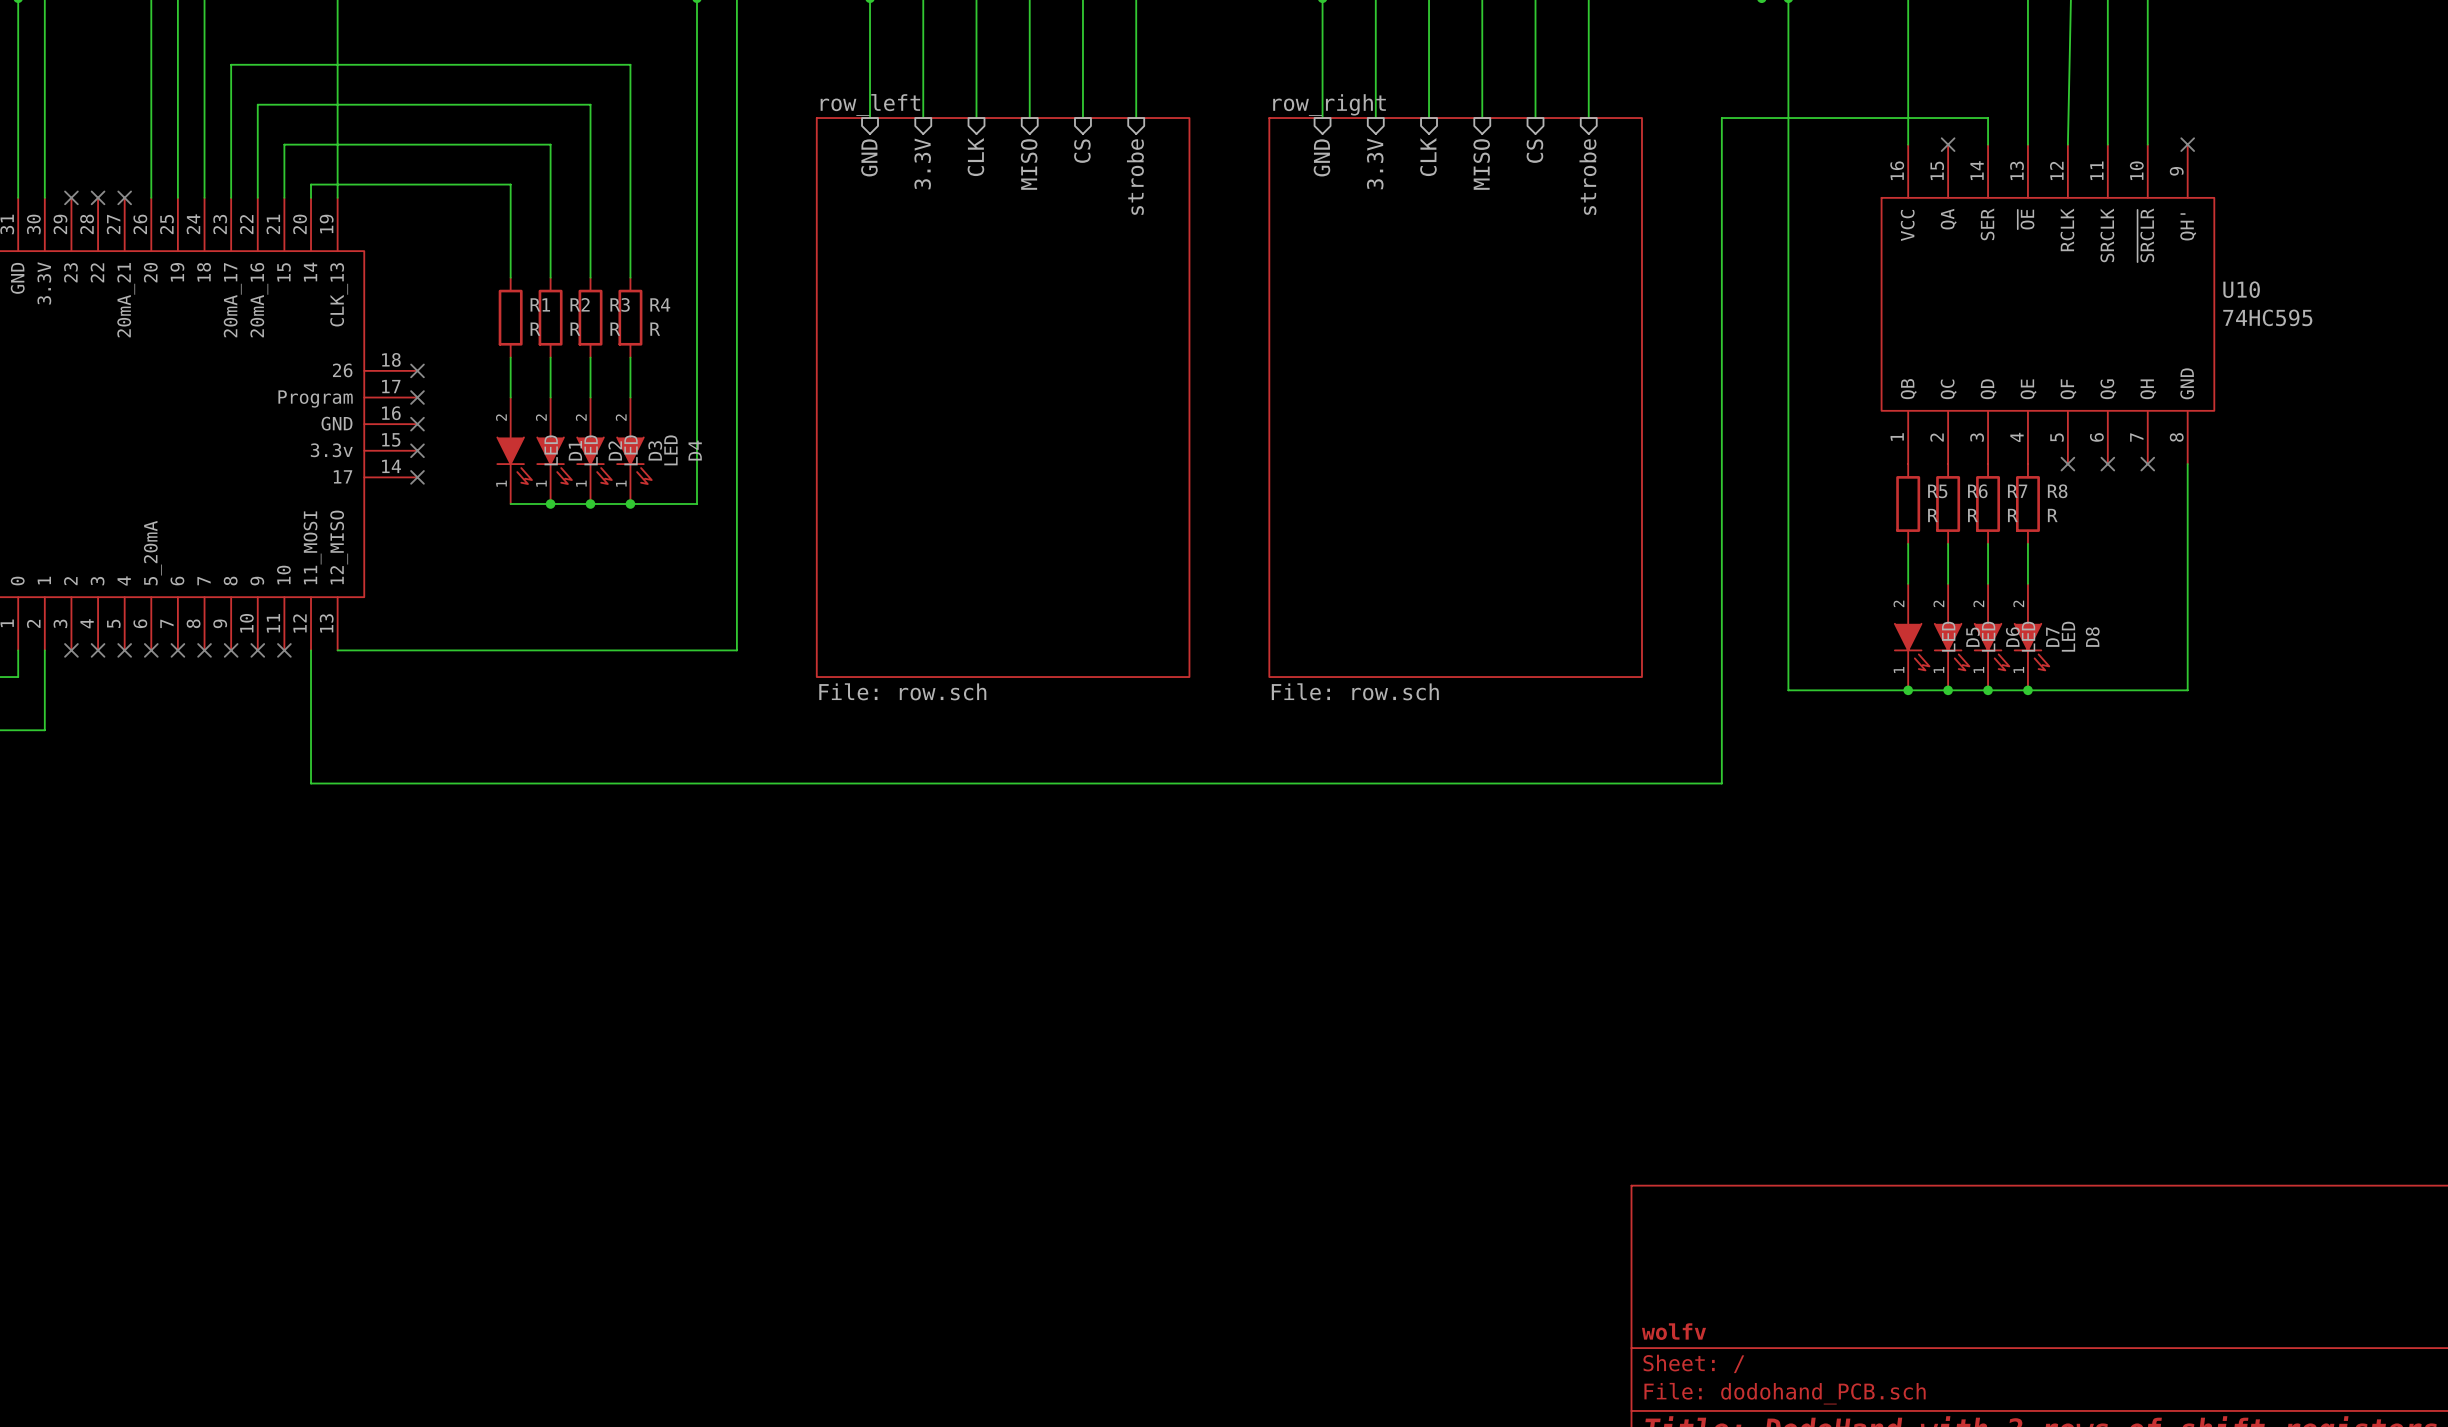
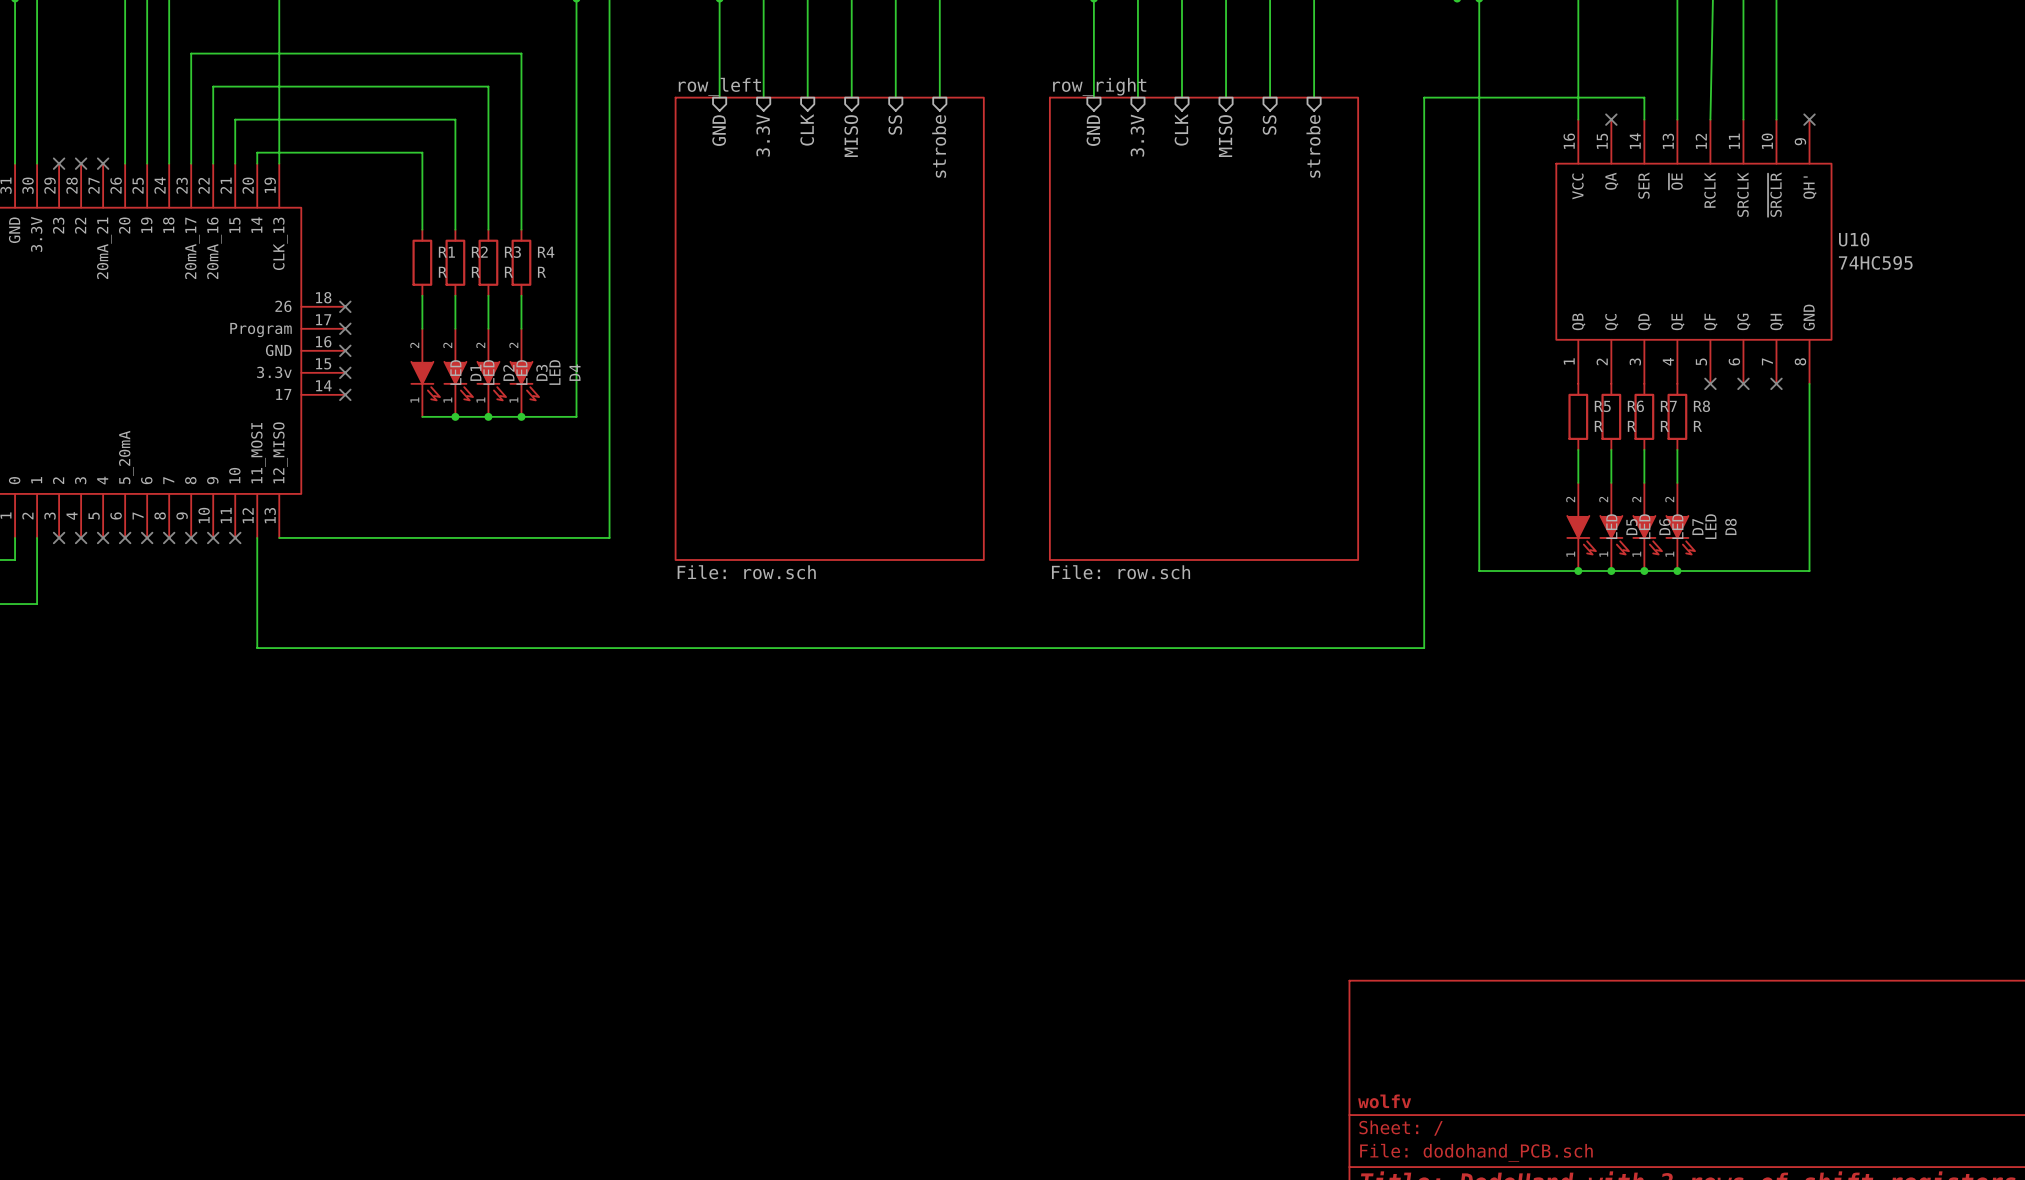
sheet pin: CS (1082, 151) -> SS (895, 125)
sheet pin: CS (1534, 151) -> SS (1269, 125)

